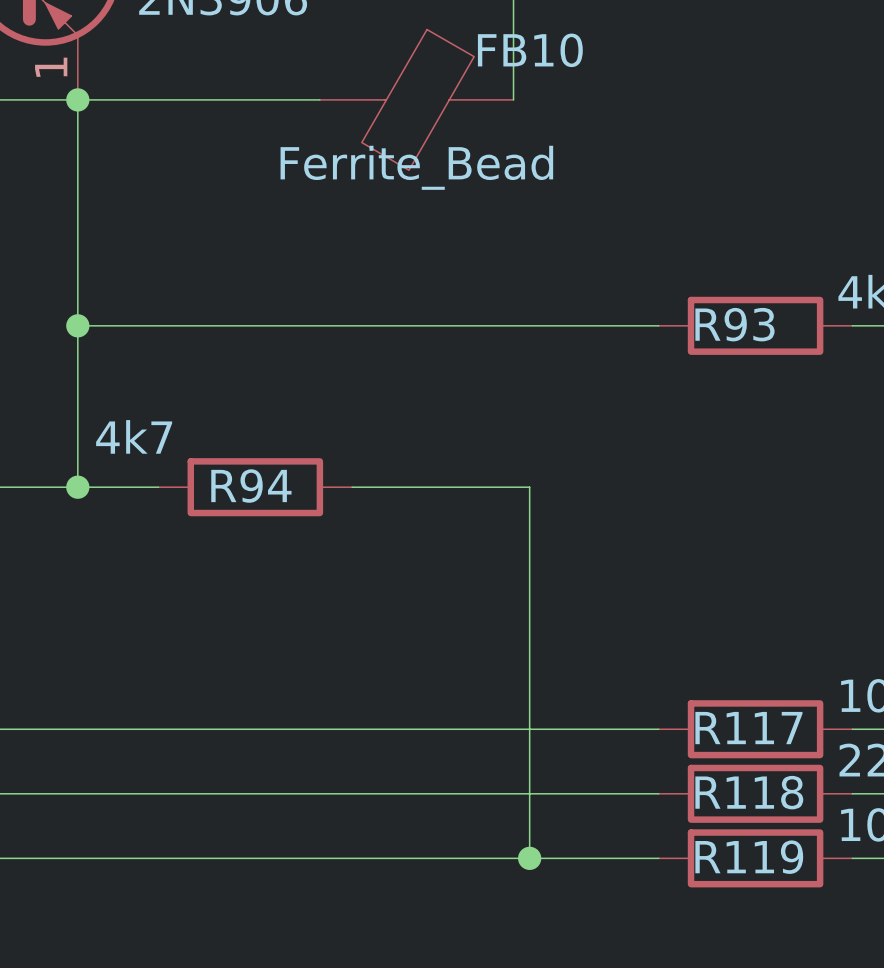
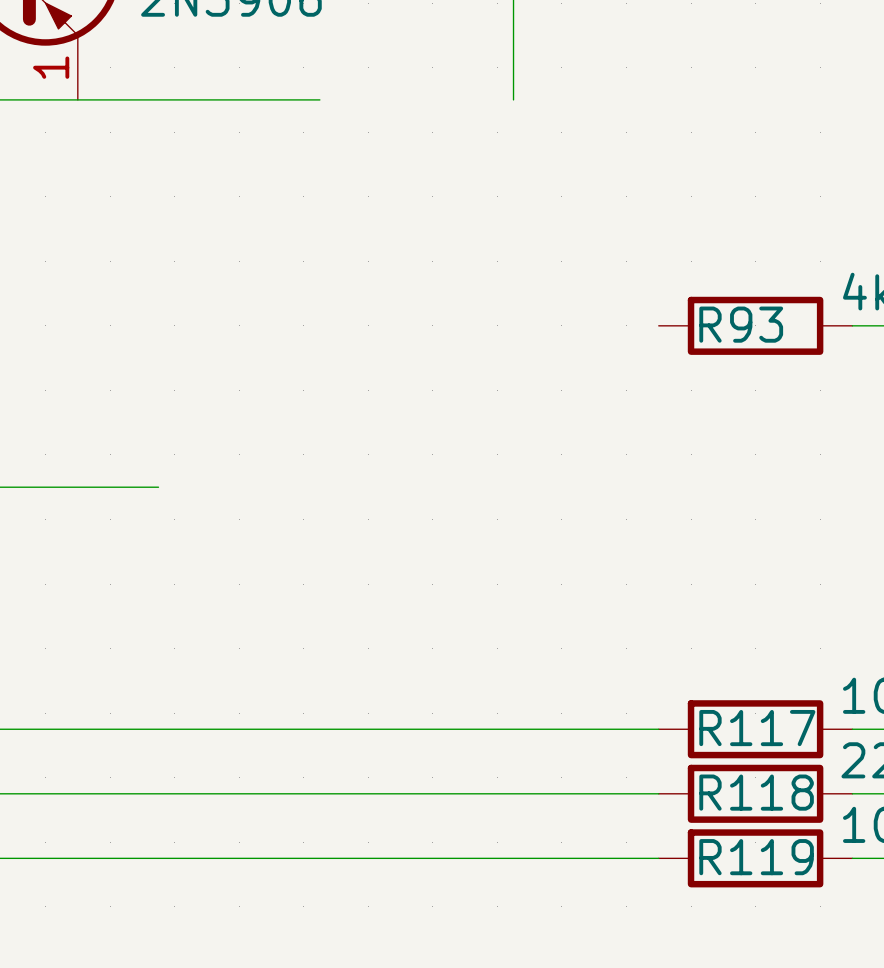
wire: (77, 99) (77, 487) -> none
junction: (77, 99) -> none
FB10: Ferrite_Bead (416, 99) -> none
wire: (77, 325) (658, 325) -> none
junction: (77, 325) -> none
junction: (77, 487) -> none
R94: 4k7 (255, 487) -> none
wire: (352, 487) (529, 487) (529, 858) -> none
junction: (529, 858) -> none

